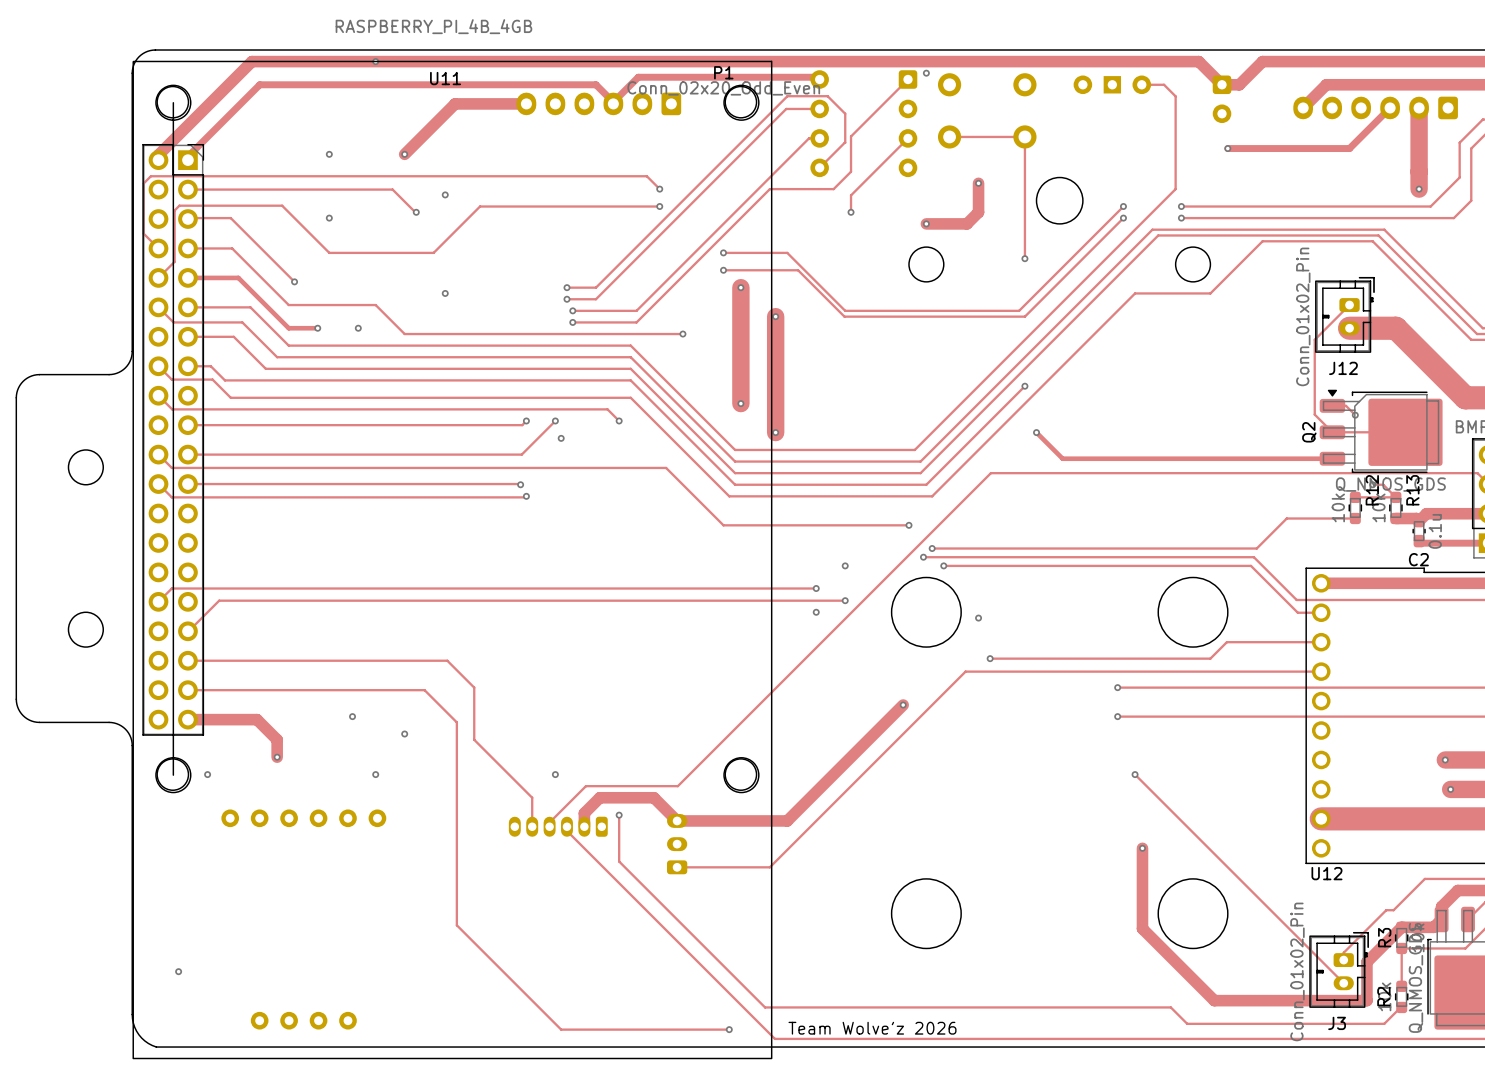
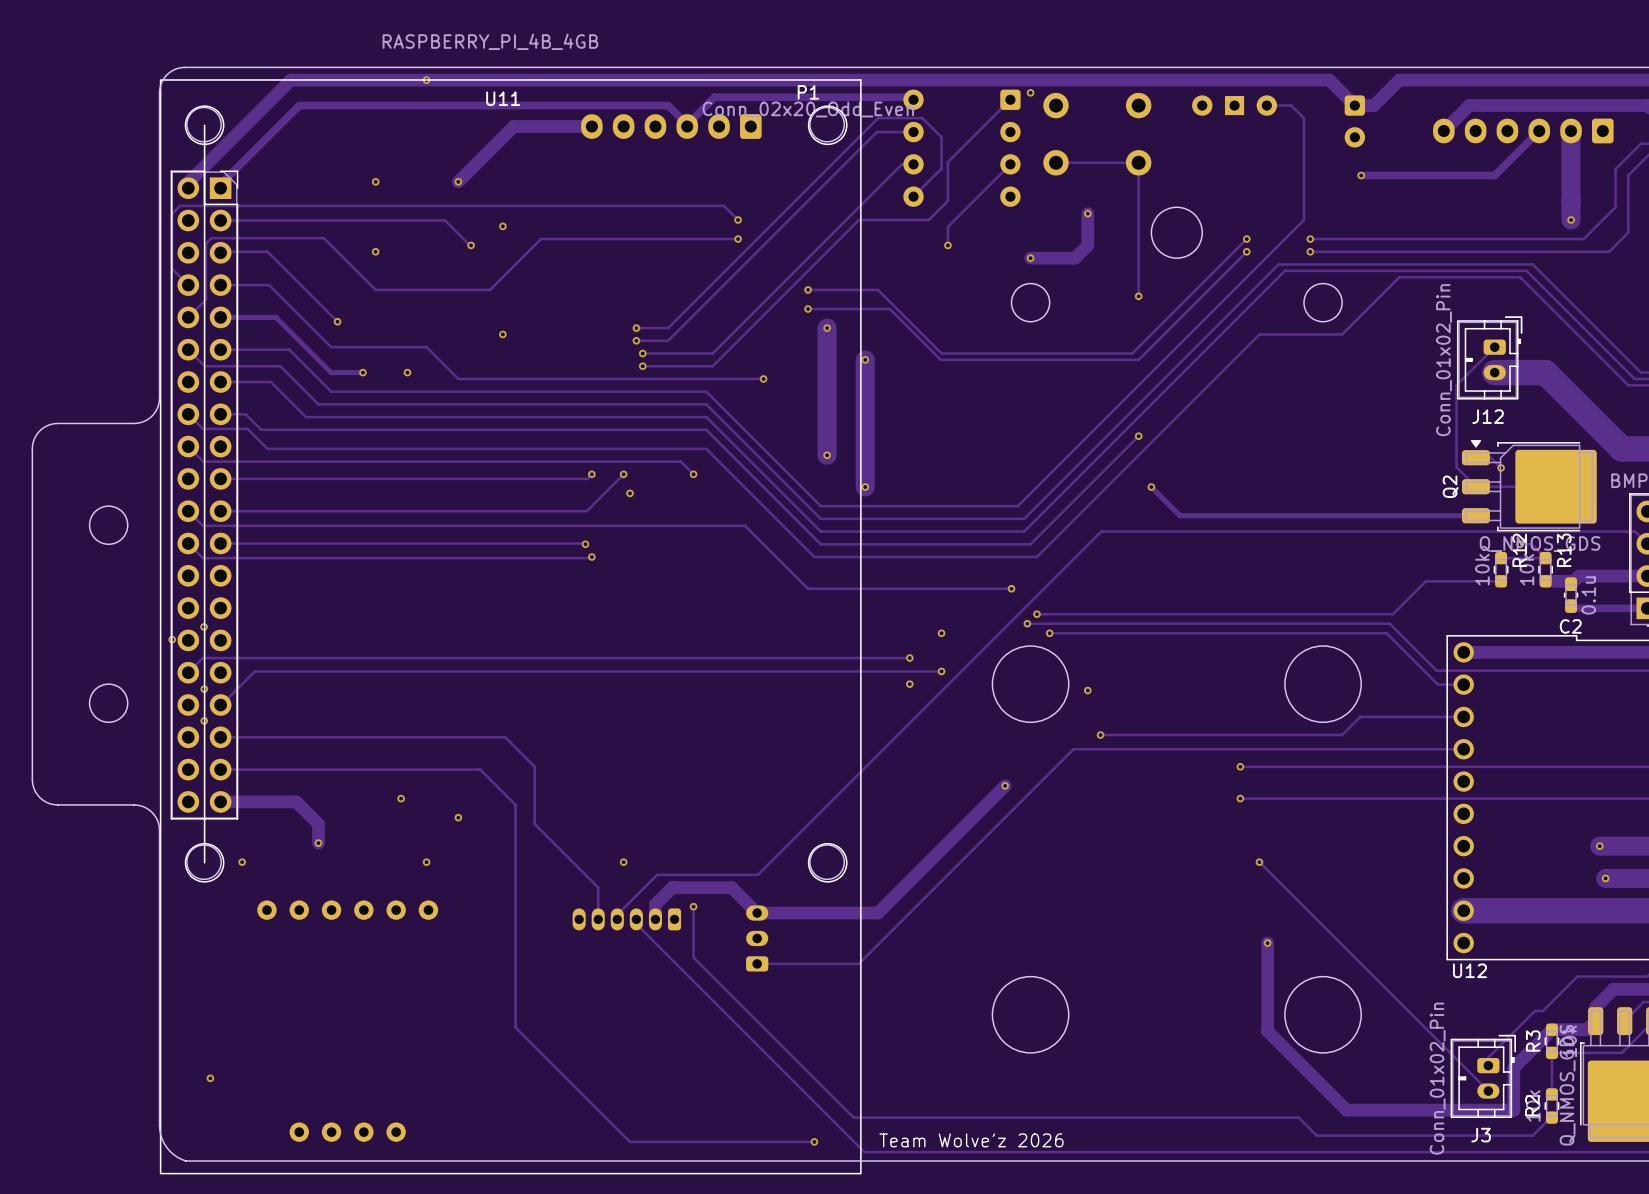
via: none -> (204, 626)
via: none -> (172, 639)
via: none -> (204, 689)
via: none -> (204, 720)

